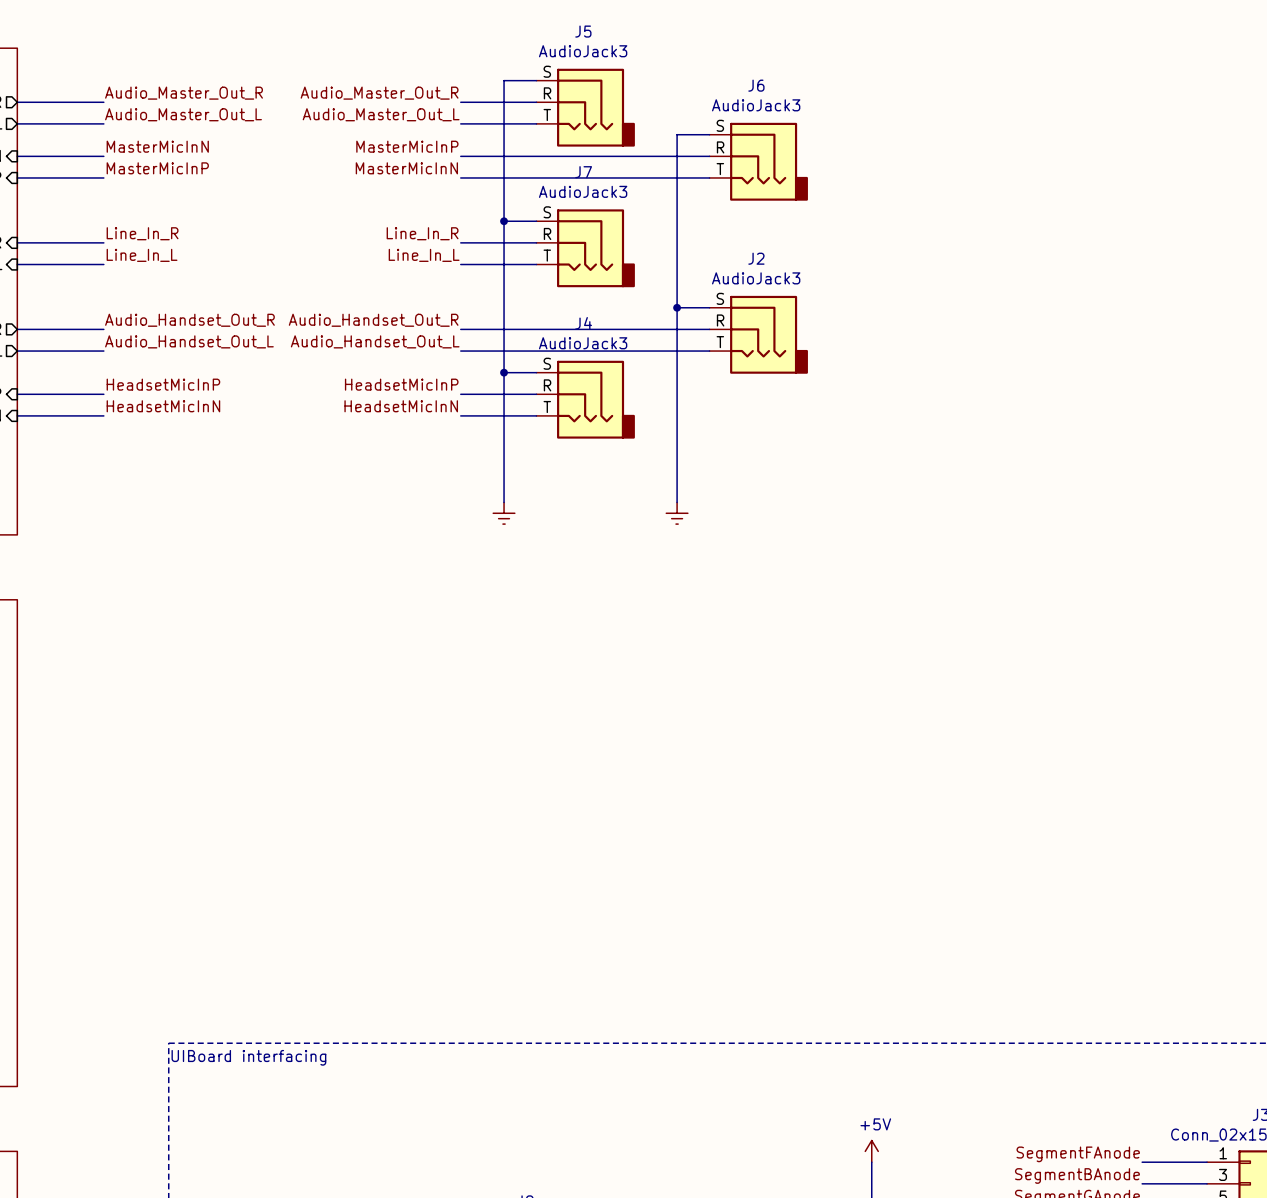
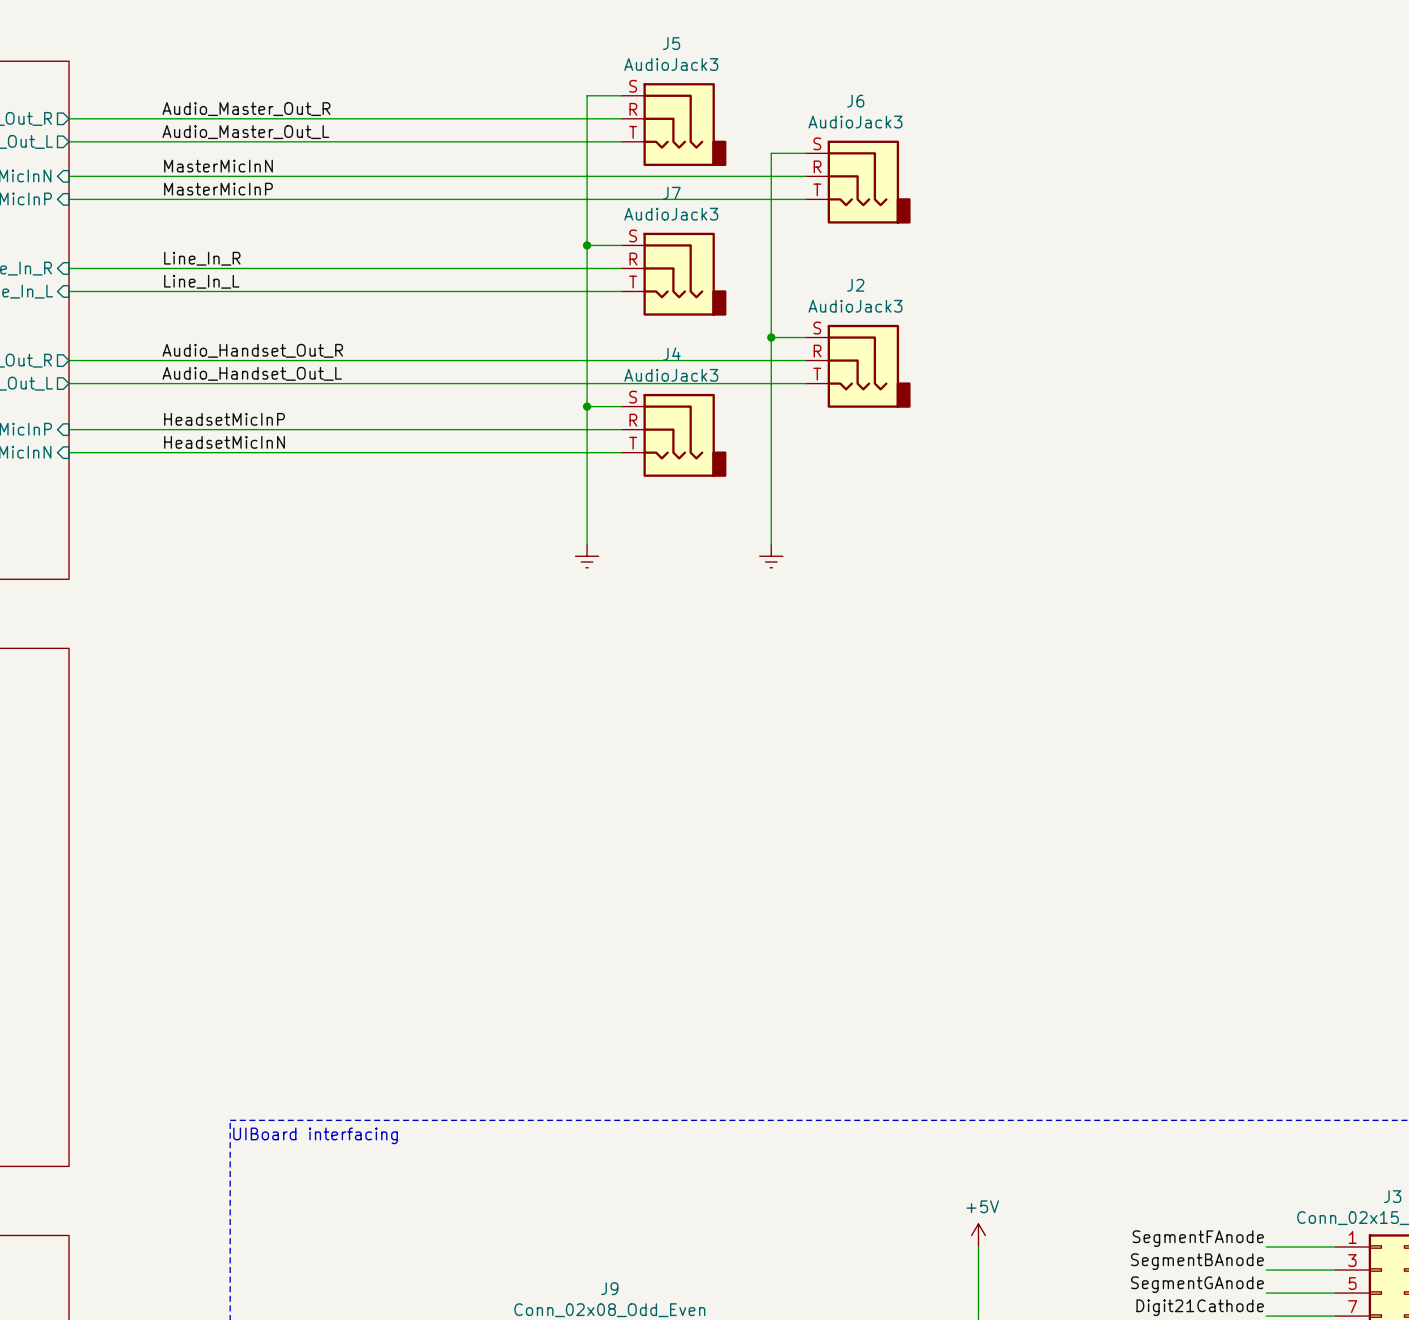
label: Audio_Master_Out_R (379, 93) -> none
wire: none -> (161, 118) (541, 118)
label: Audio_Master_Out_L (381, 114) -> none
wire: none -> (161, 141) (541, 141)
label: MasterMicInP (407, 146) -> none
wire: none -> (161, 176) (541, 176)
label: MasterMicInN (406, 168) -> none
wire: none -> (161, 199) (541, 199)
label: Line_In_R (422, 233) -> none
wire: none -> (161, 268) (541, 268)
label: Line_In_L (424, 255) -> none
wire: none -> (161, 291) (541, 291)
label: Audio_Handset_Out_R (373, 320) -> none
wire: none -> (161, 360) (541, 360)
label: Audio_Handset_Out_L (375, 341) -> none
wire: none -> (161, 383) (541, 383)
label: HeadsetMicInP (401, 384) -> none
wire: none -> (161, 429) (541, 429)
label: HeadsetMicInN (401, 406) -> none
wire: none -> (161, 452) (541, 452)

